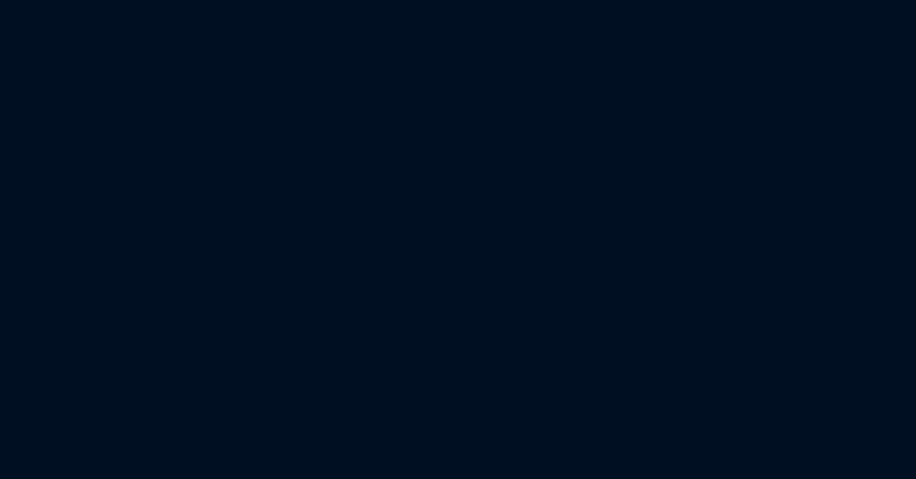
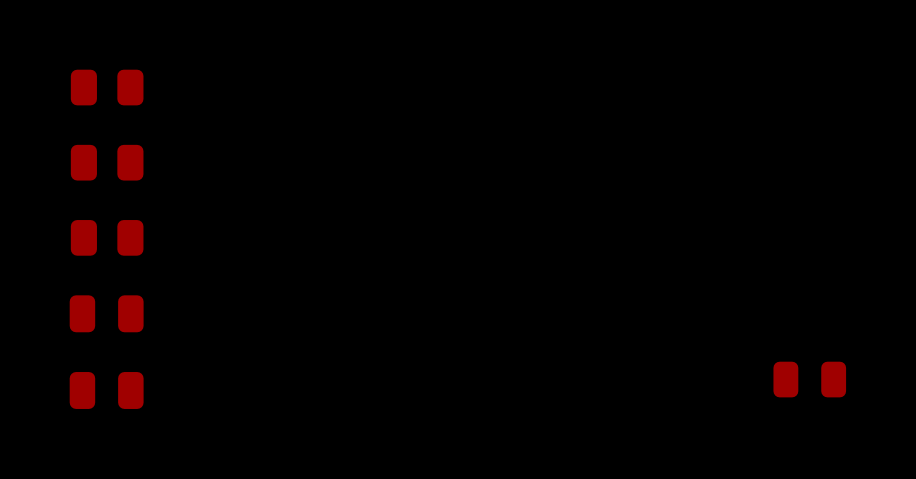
part: none -> (107, 87)
part: none -> (107, 162)
part: none -> (107, 237)
part: none -> (106, 313)
part: none -> (809, 379)
part: none -> (106, 390)

